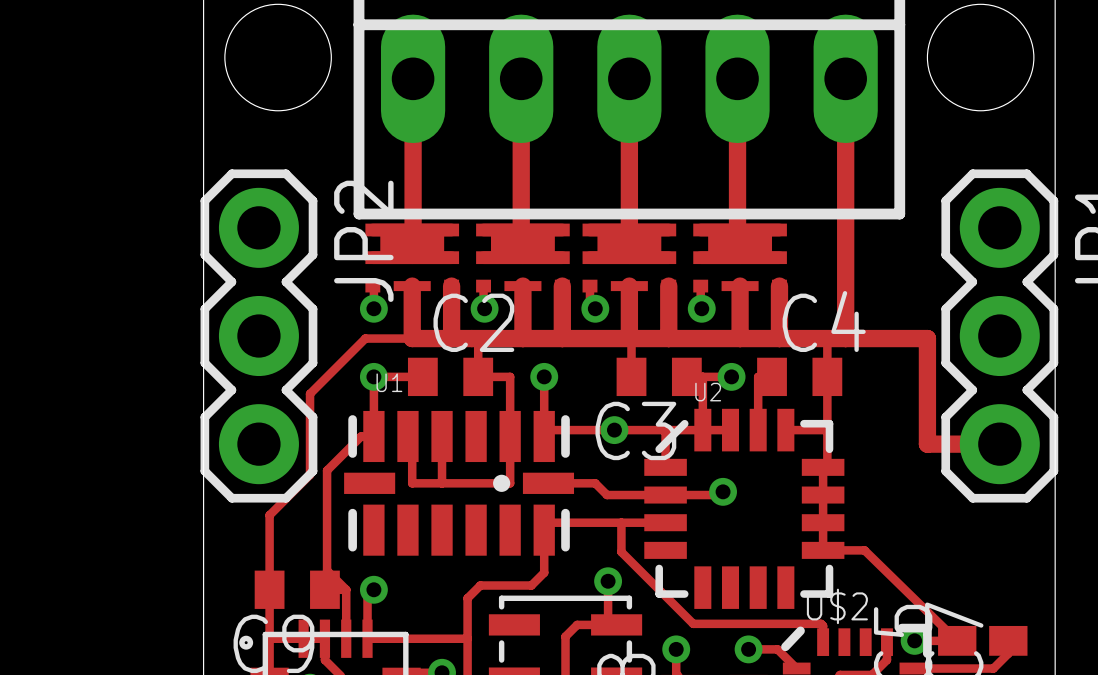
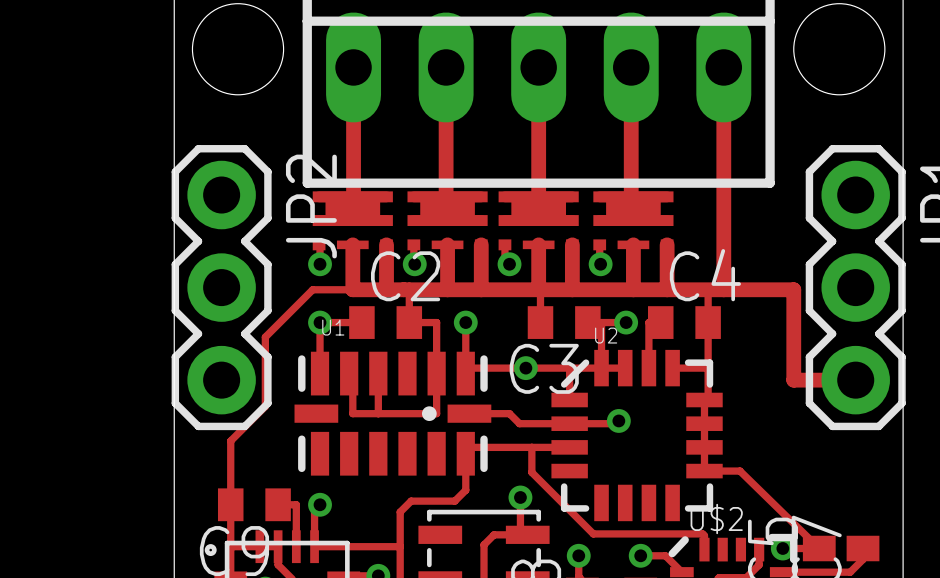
track: (373, 436) (361, 436) (327, 470) (327, 570) (346, 589) -> none

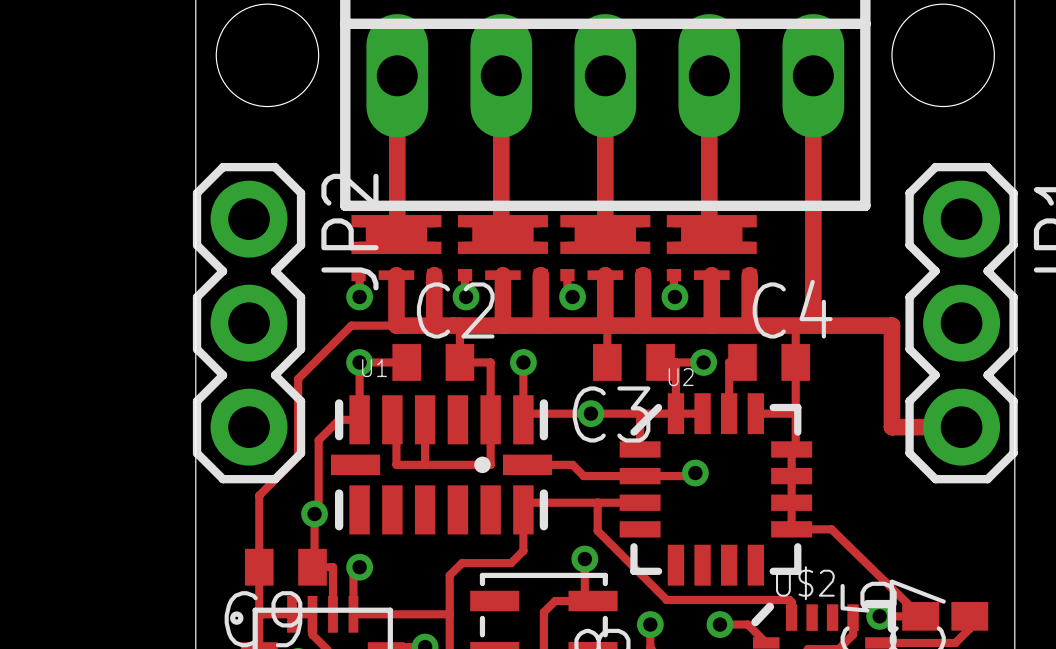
track: none -> (359, 419) (339, 419) (318, 440) (318, 509) (314, 513) (314, 565) (312, 567)
via: none -> (314, 513)

